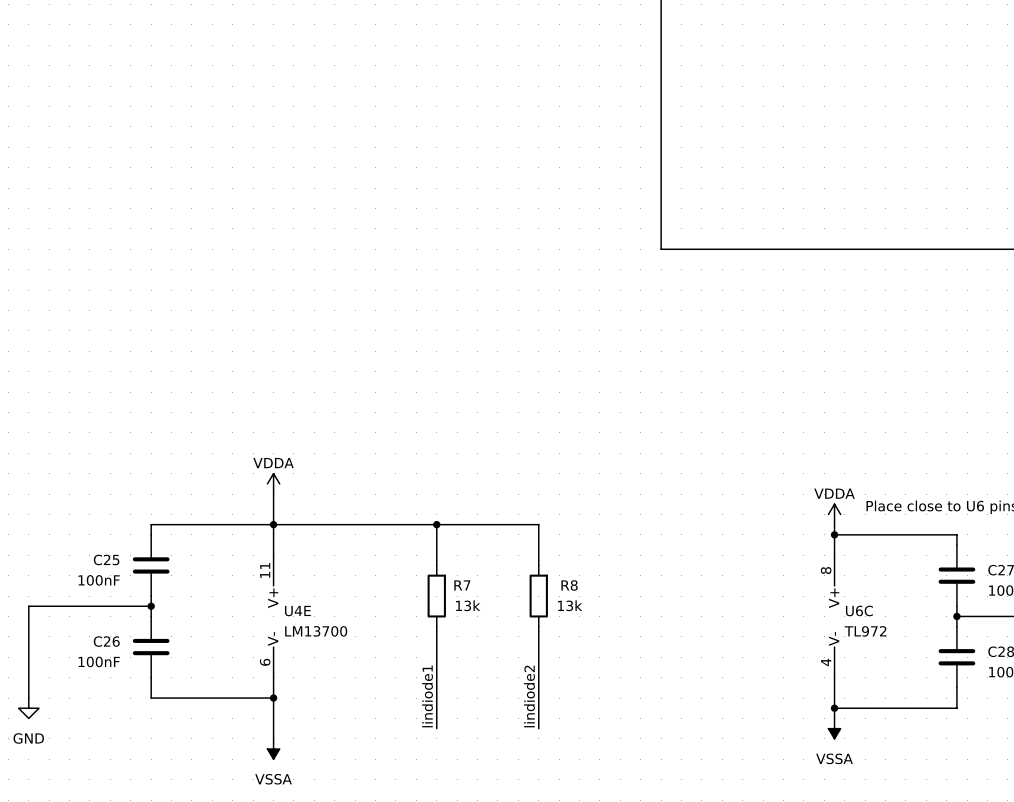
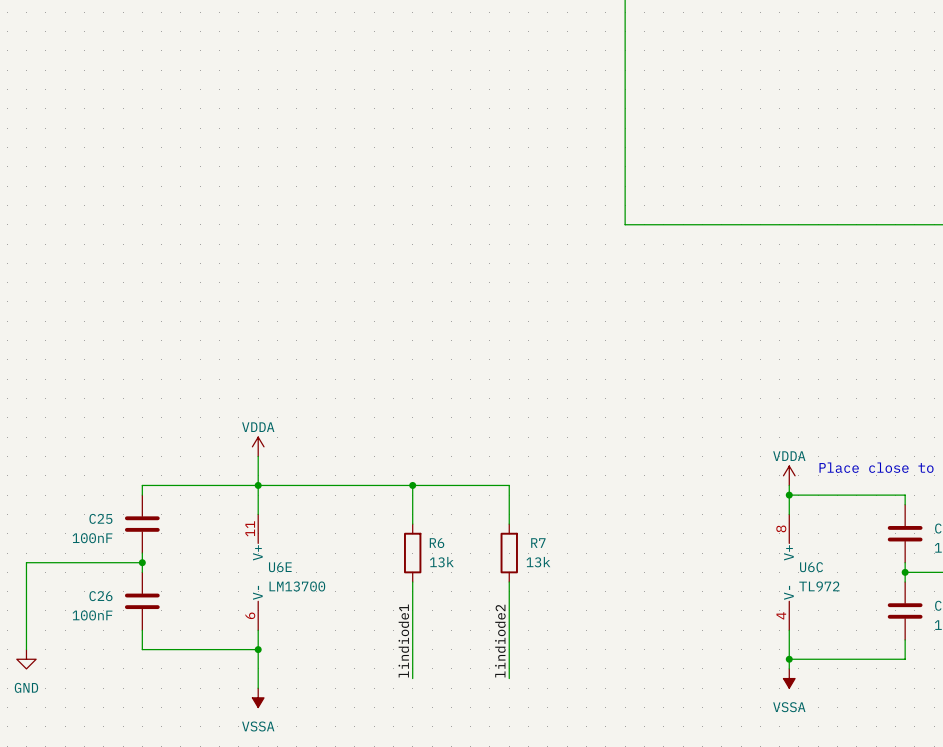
R7 name: R7 (462, 585) -> R6 (437, 543)
R8 name: R8 (569, 585) -> R7 (538, 543)
U4E name: U4E (297, 611) -> U6E (280, 567)

